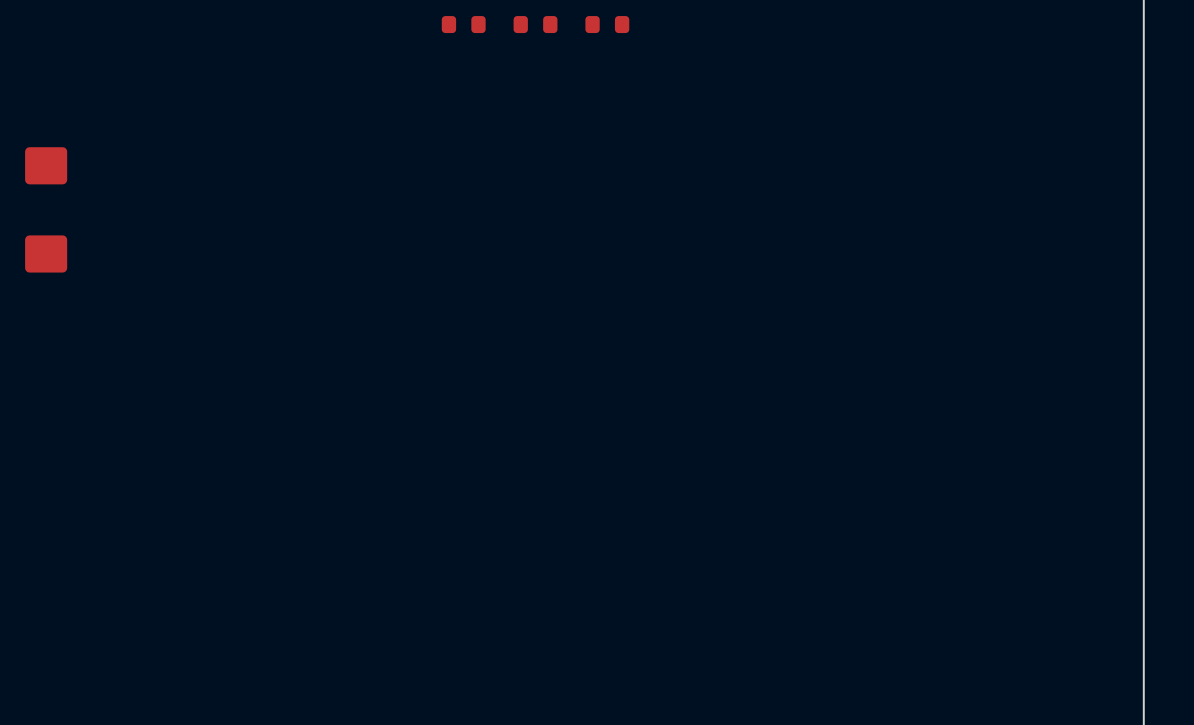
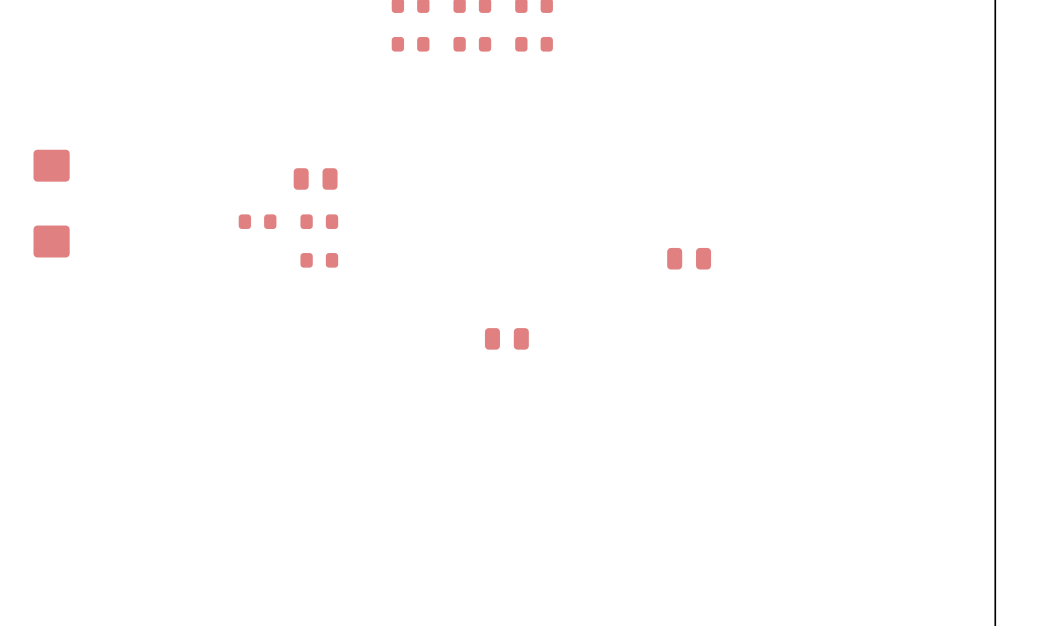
part: none -> (315, 178)
part: none -> (257, 221)
part: none -> (319, 221)
part: none -> (689, 258)
part: none -> (319, 260)
part: none -> (506, 338)

